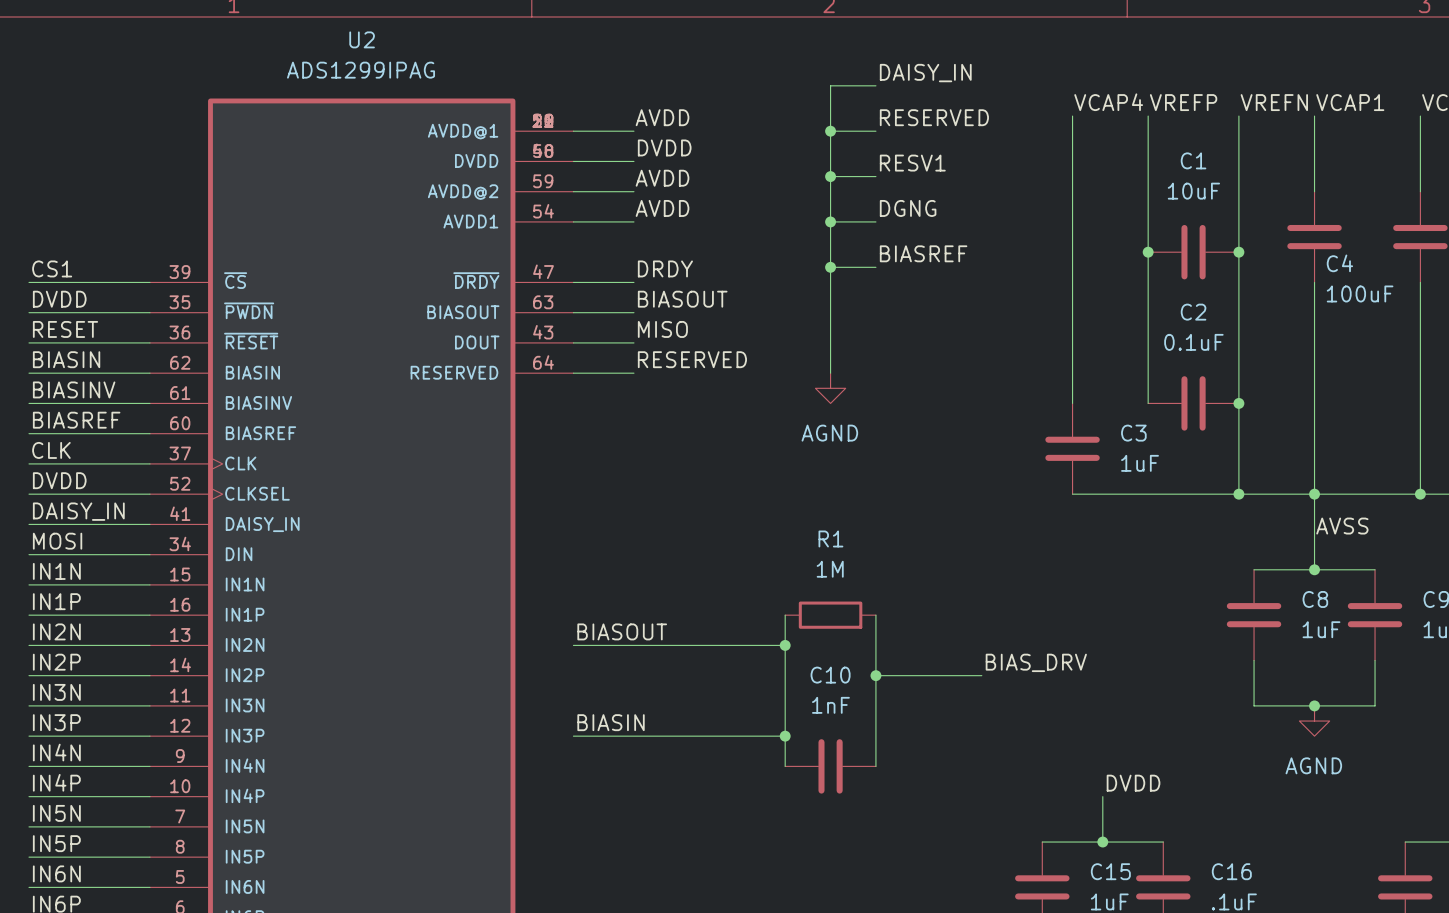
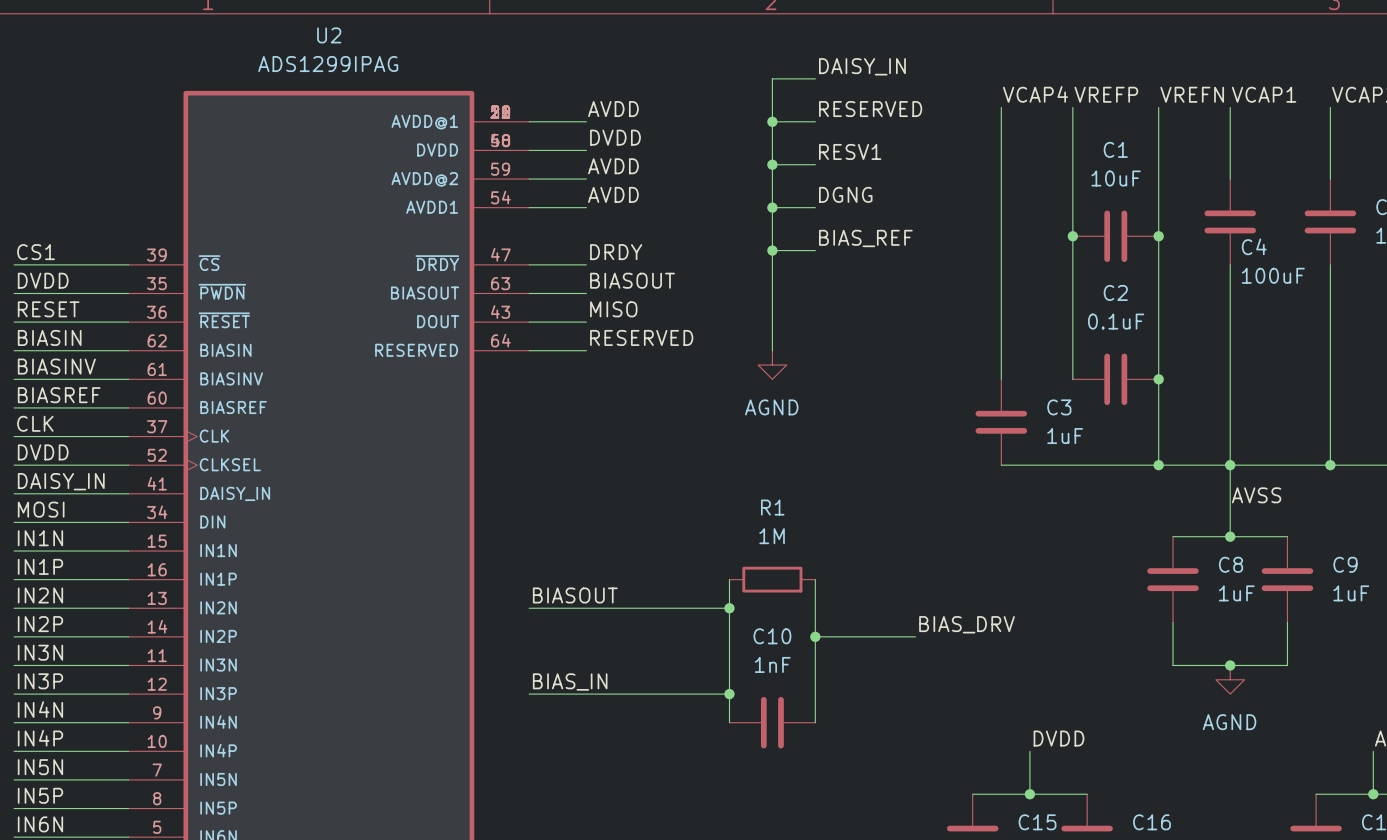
label: BIASREF (923, 253) -> BIAS_REF (865, 238)
label: BIASIN (611, 722) -> BIAS_IN (570, 682)

